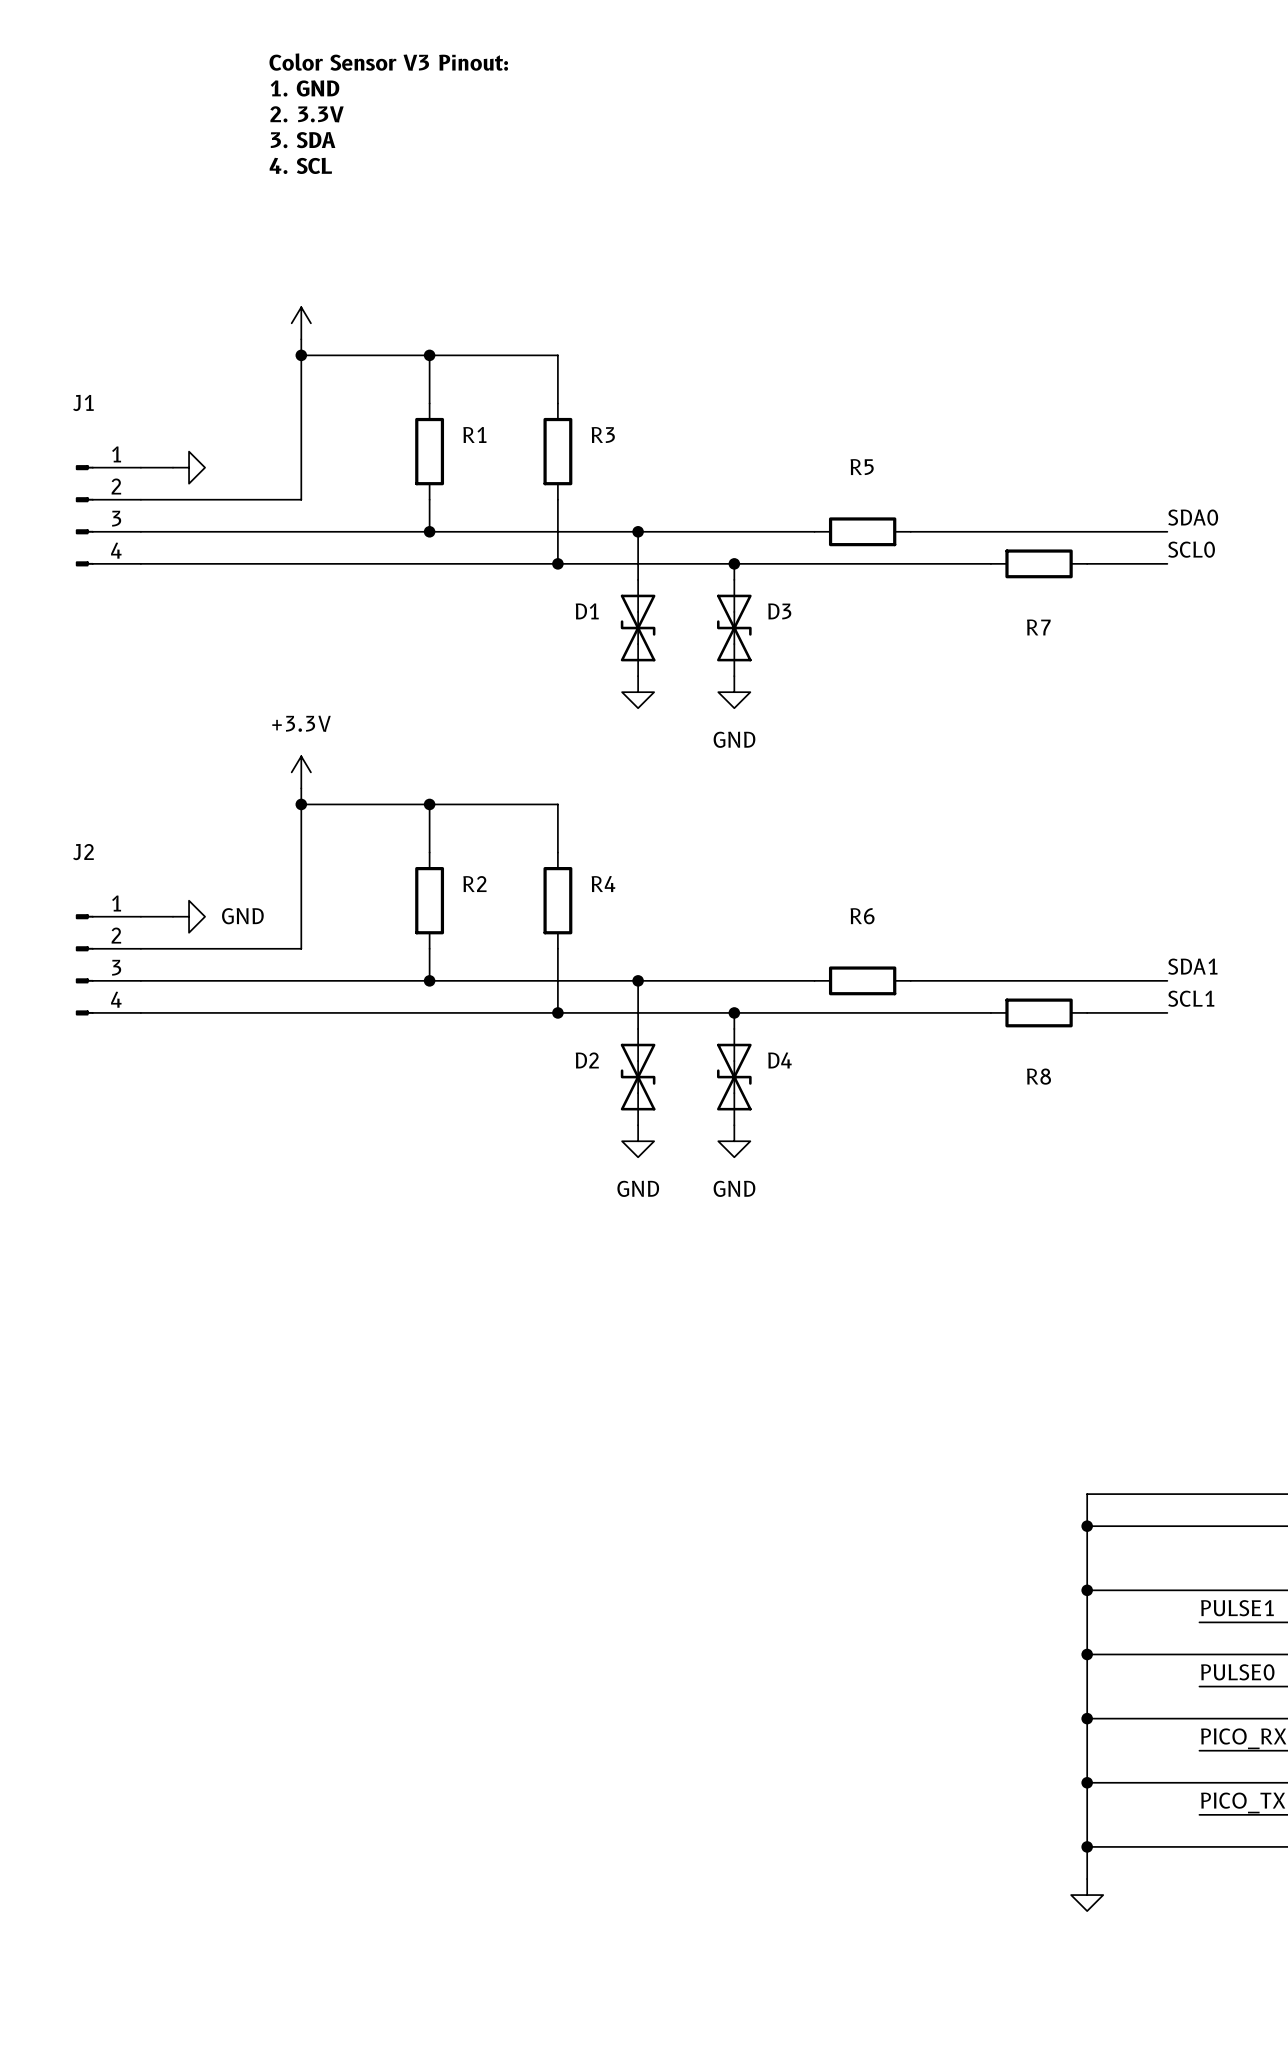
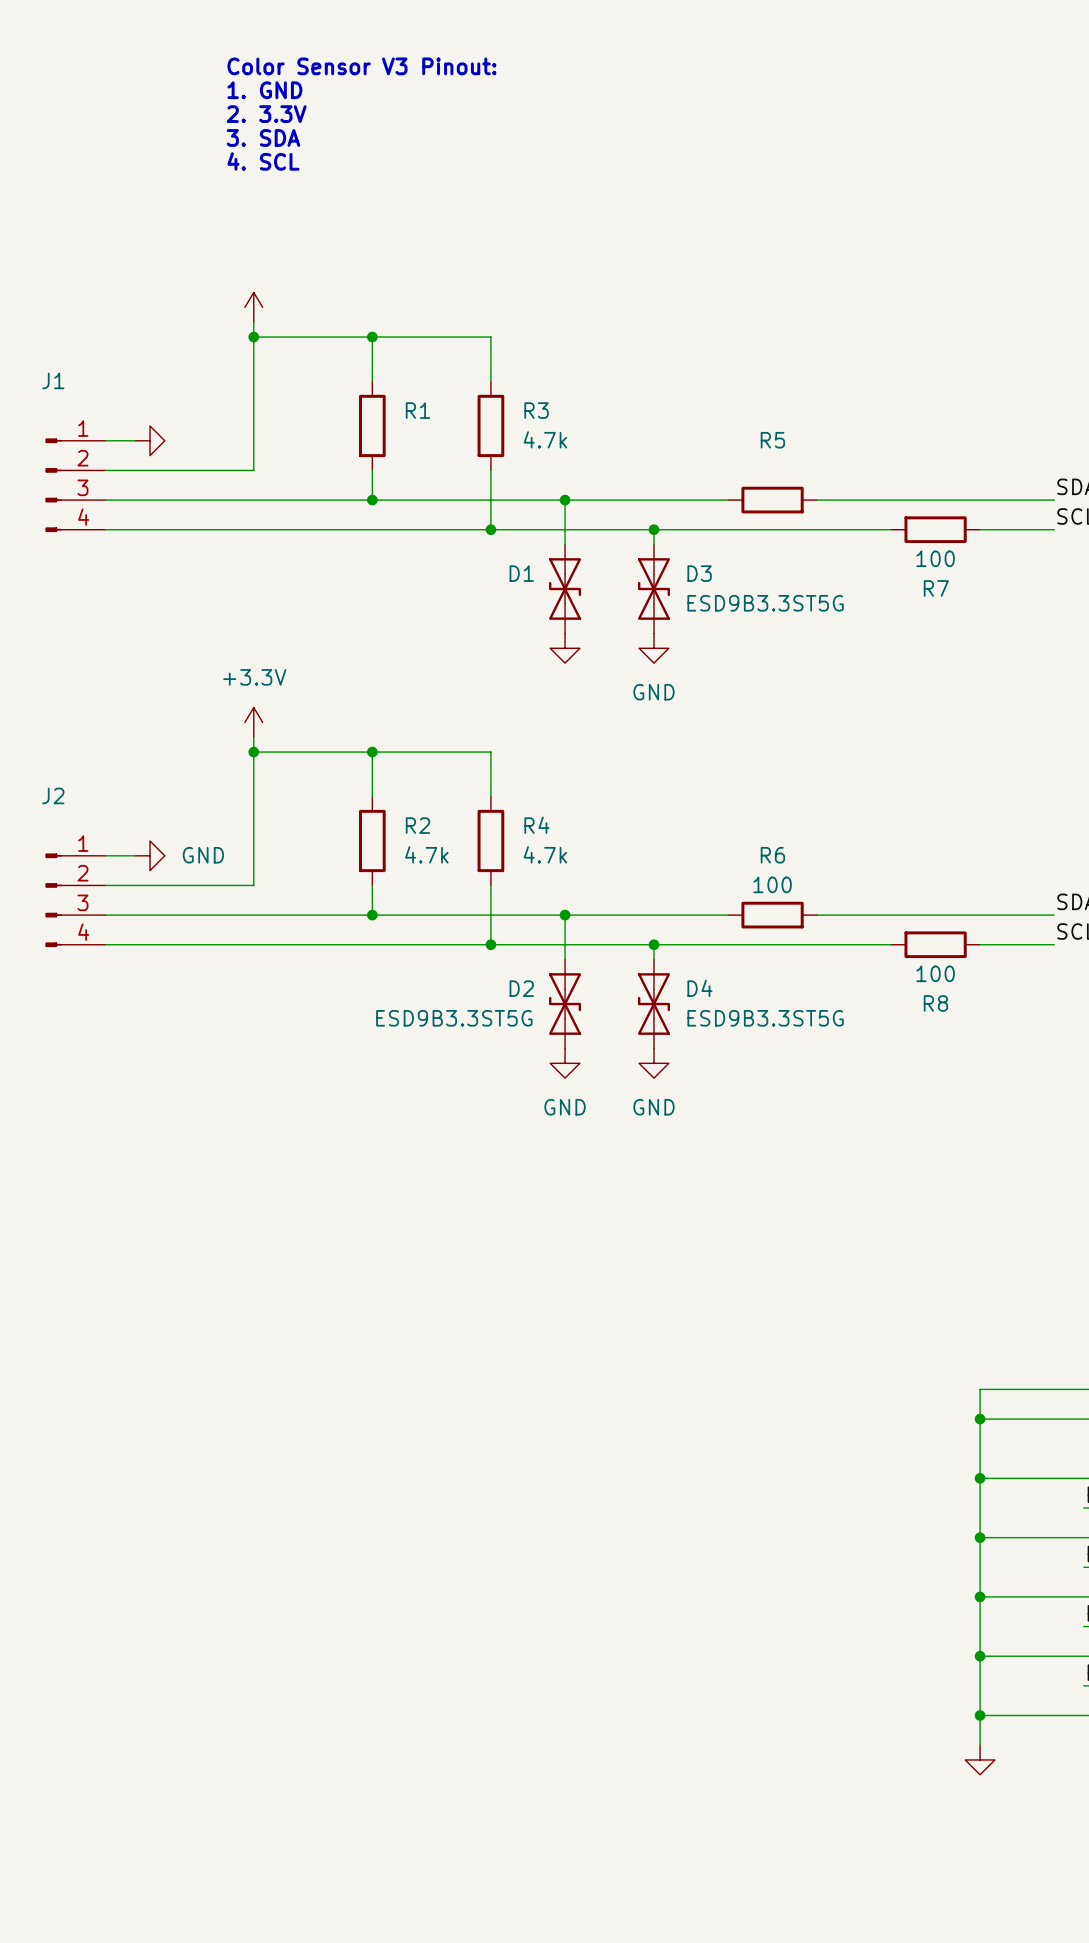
R3 value: none -> 4.7k (545, 439)
R7 value: none -> 100 (935, 558)
D3 value: none -> ESD9B3.3ST5G (765, 603)
R2 value: none -> 4.7k (426, 854)
R4 value: none -> 4.7k (545, 854)
R6 value: none -> 100 (772, 884)
R8 value: none -> 100 (935, 973)
D2 value: none -> ESD9B3.3ST5G (454, 1018)
D4 value: none -> ESD9B3.3ST5G (765, 1018)

